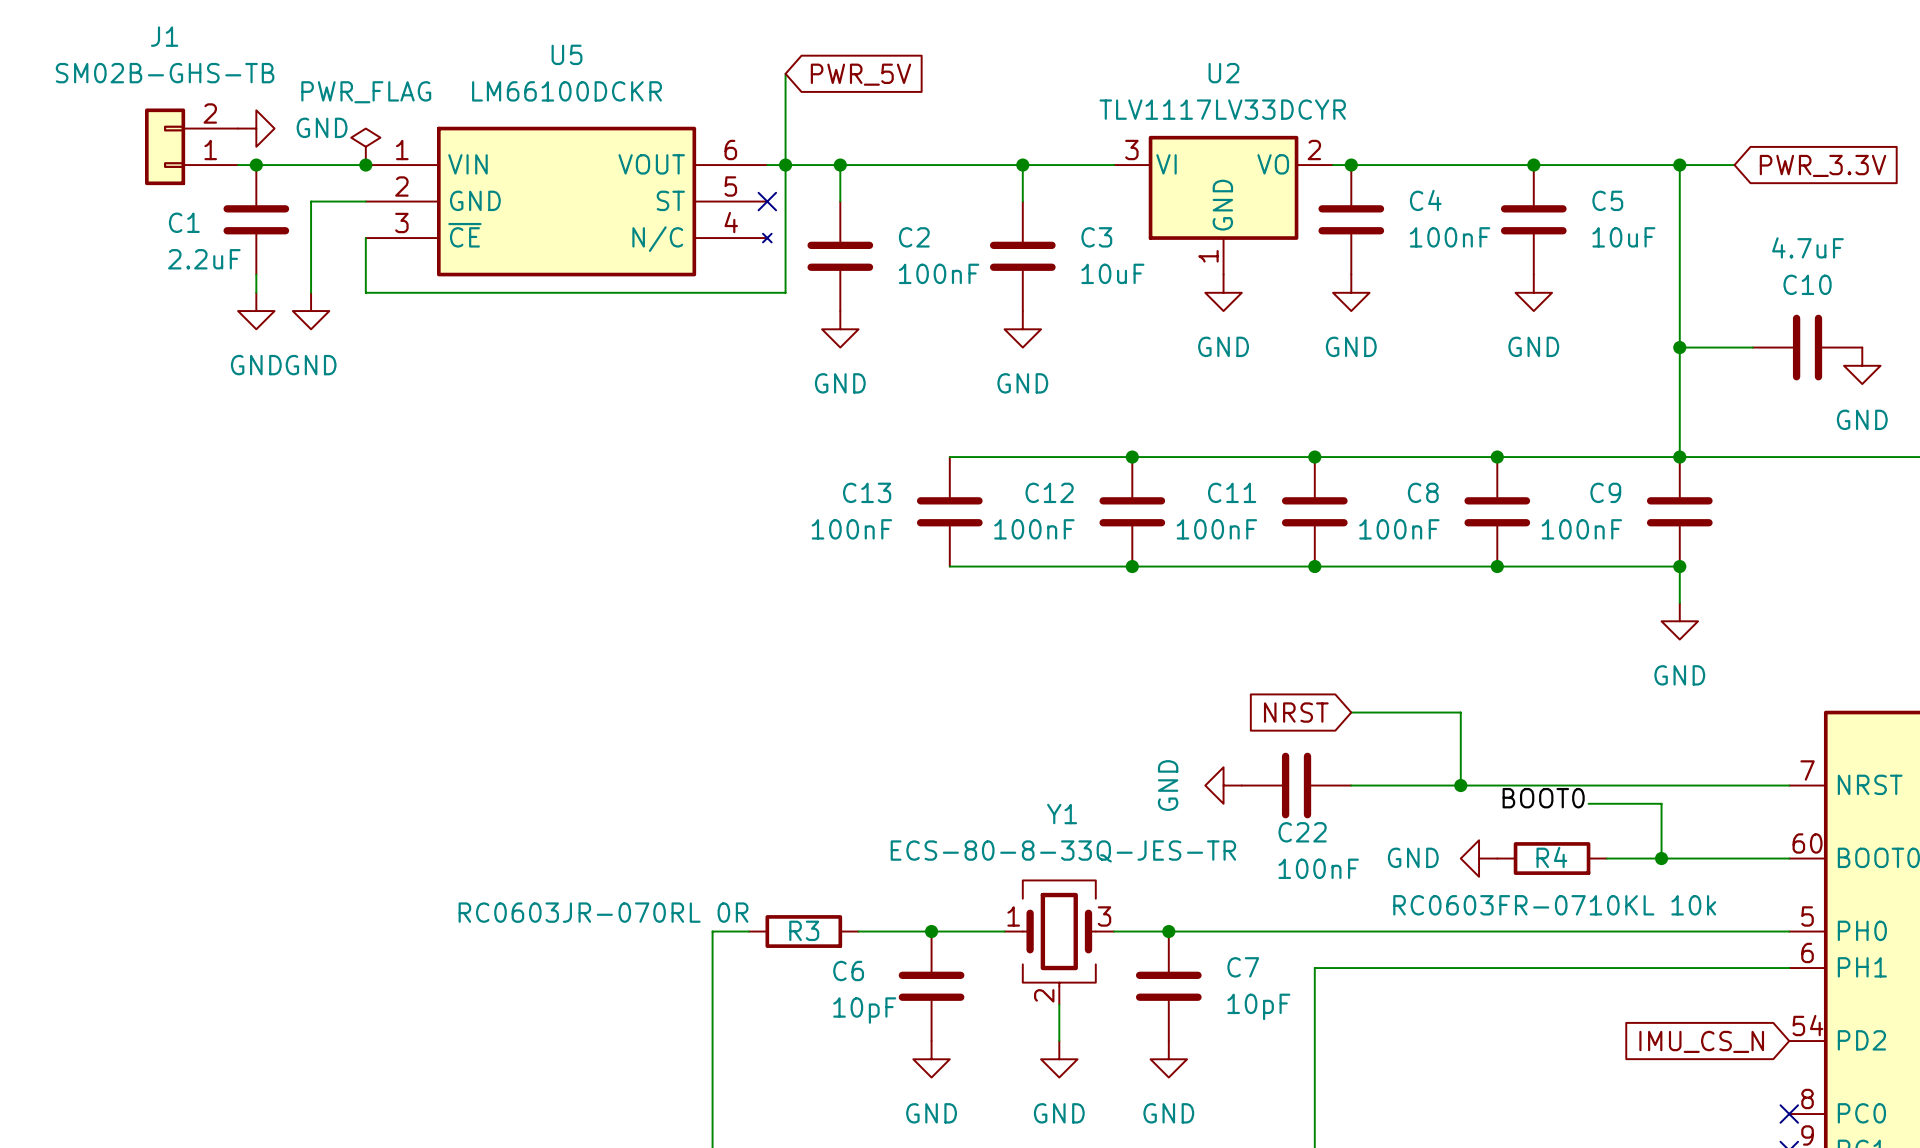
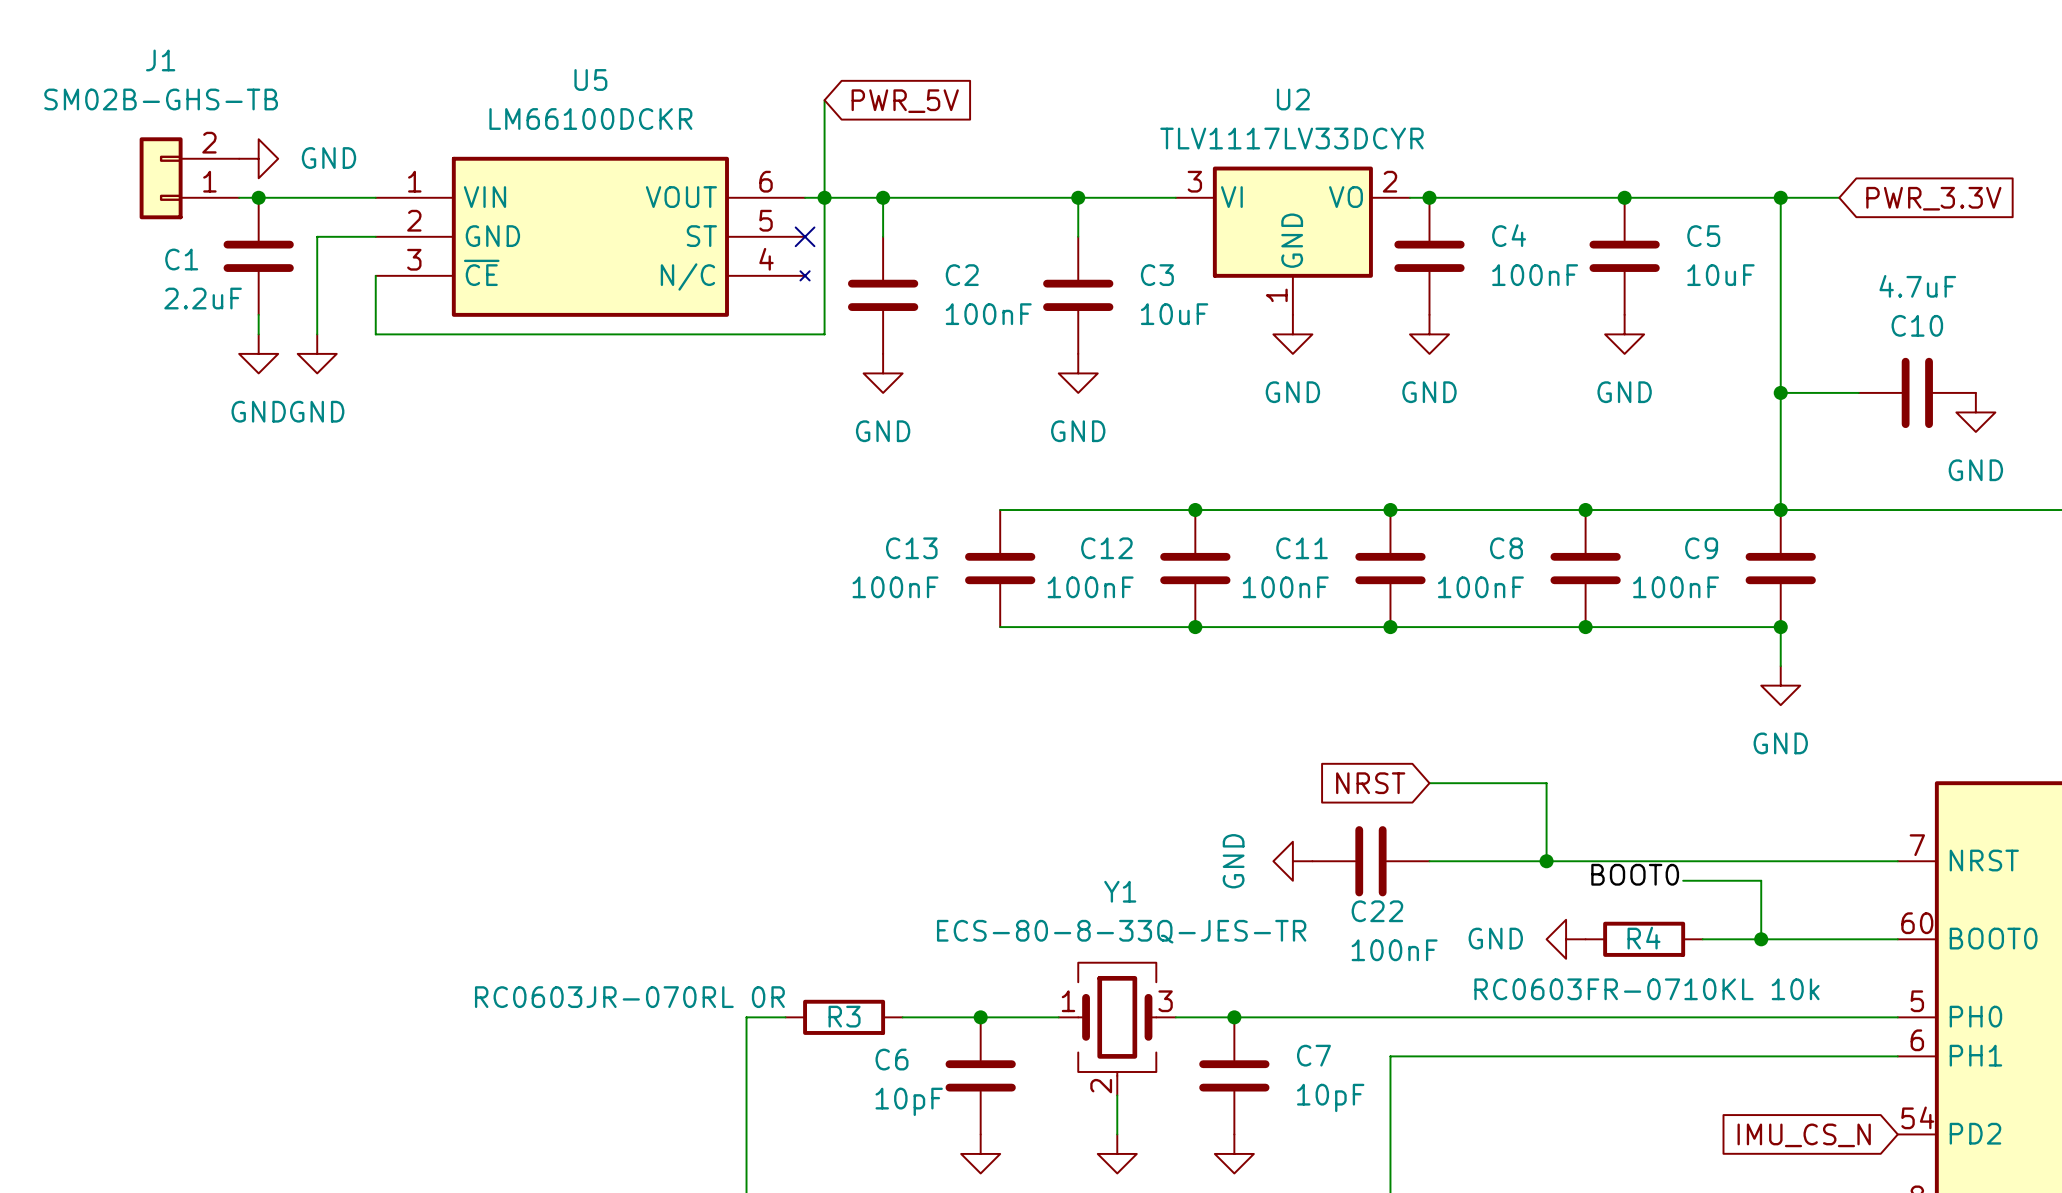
power symbol: PWR_FLAG (365, 146) -> none
junction: (365, 165) -> none

